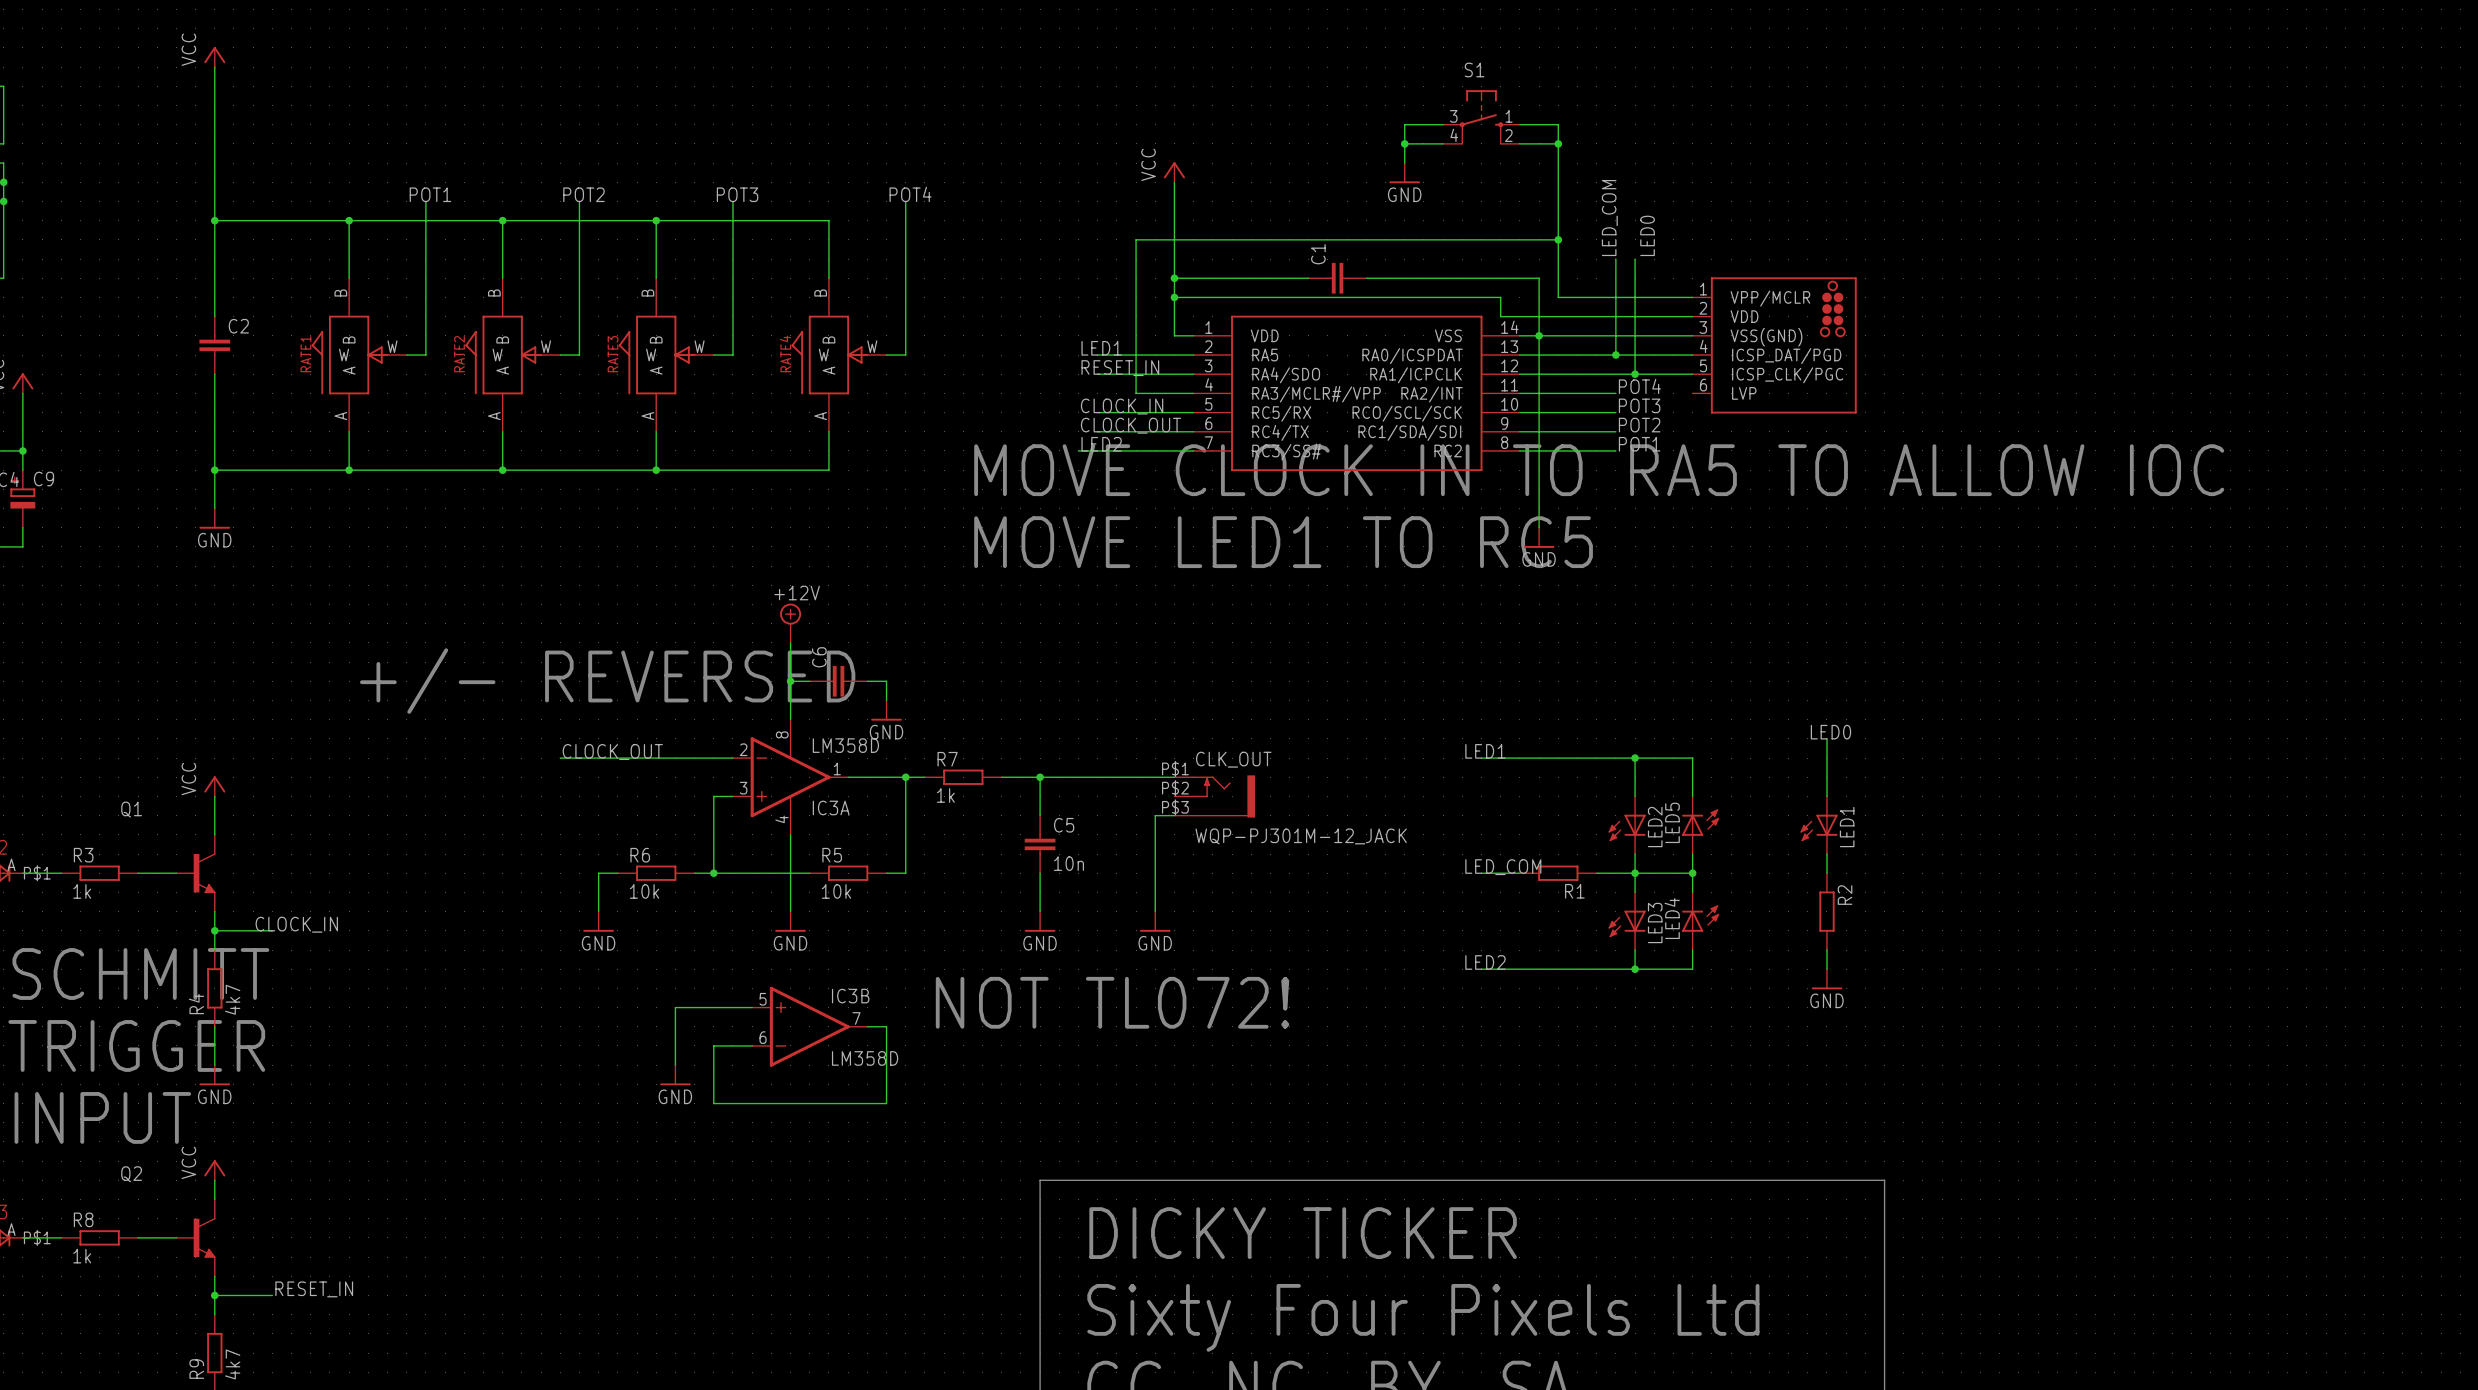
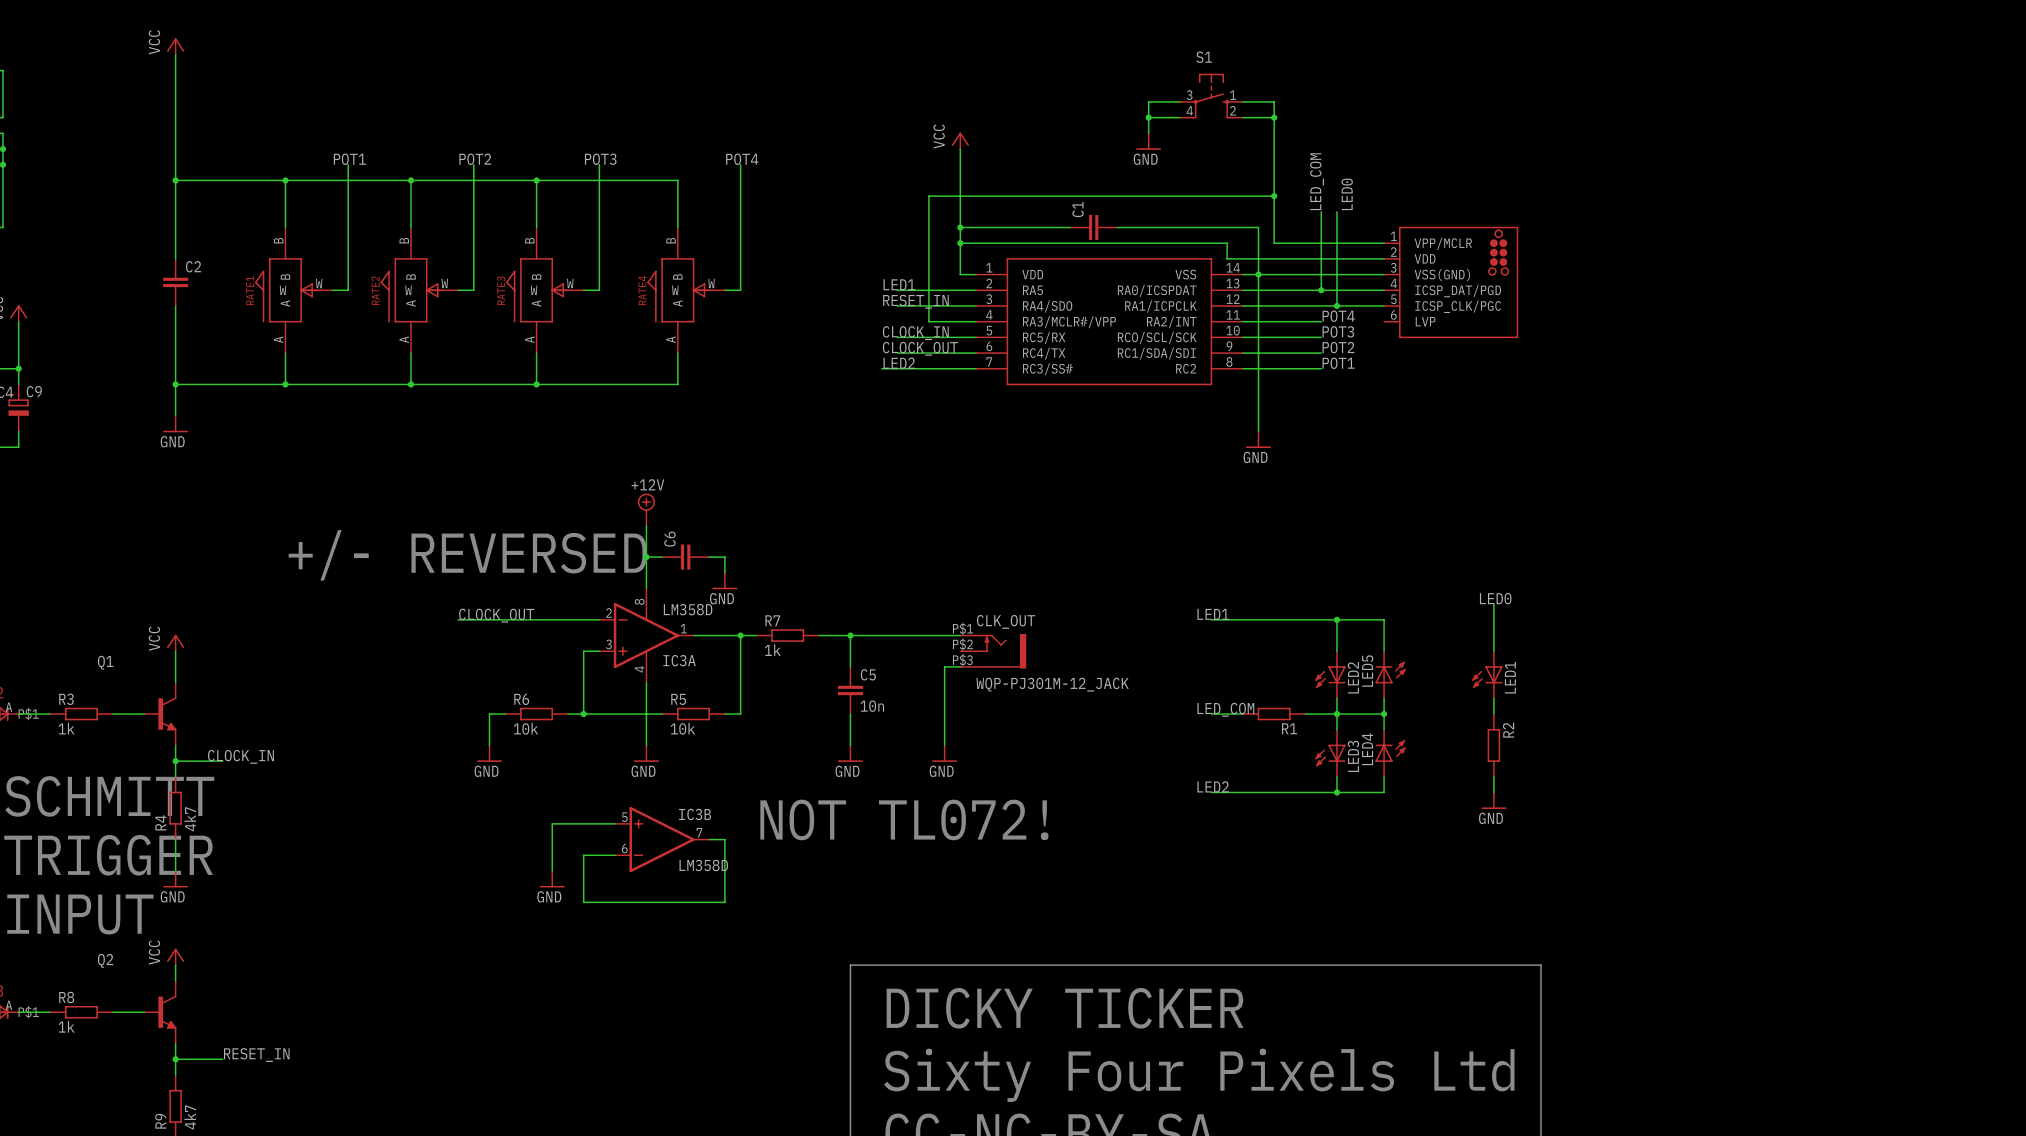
text: MOVE CLOCK IN TO RA5 TO ALLOW IOC (1599, 470) -> none
text: MOVE LED1 TO RC5 (1283, 542) -> none

